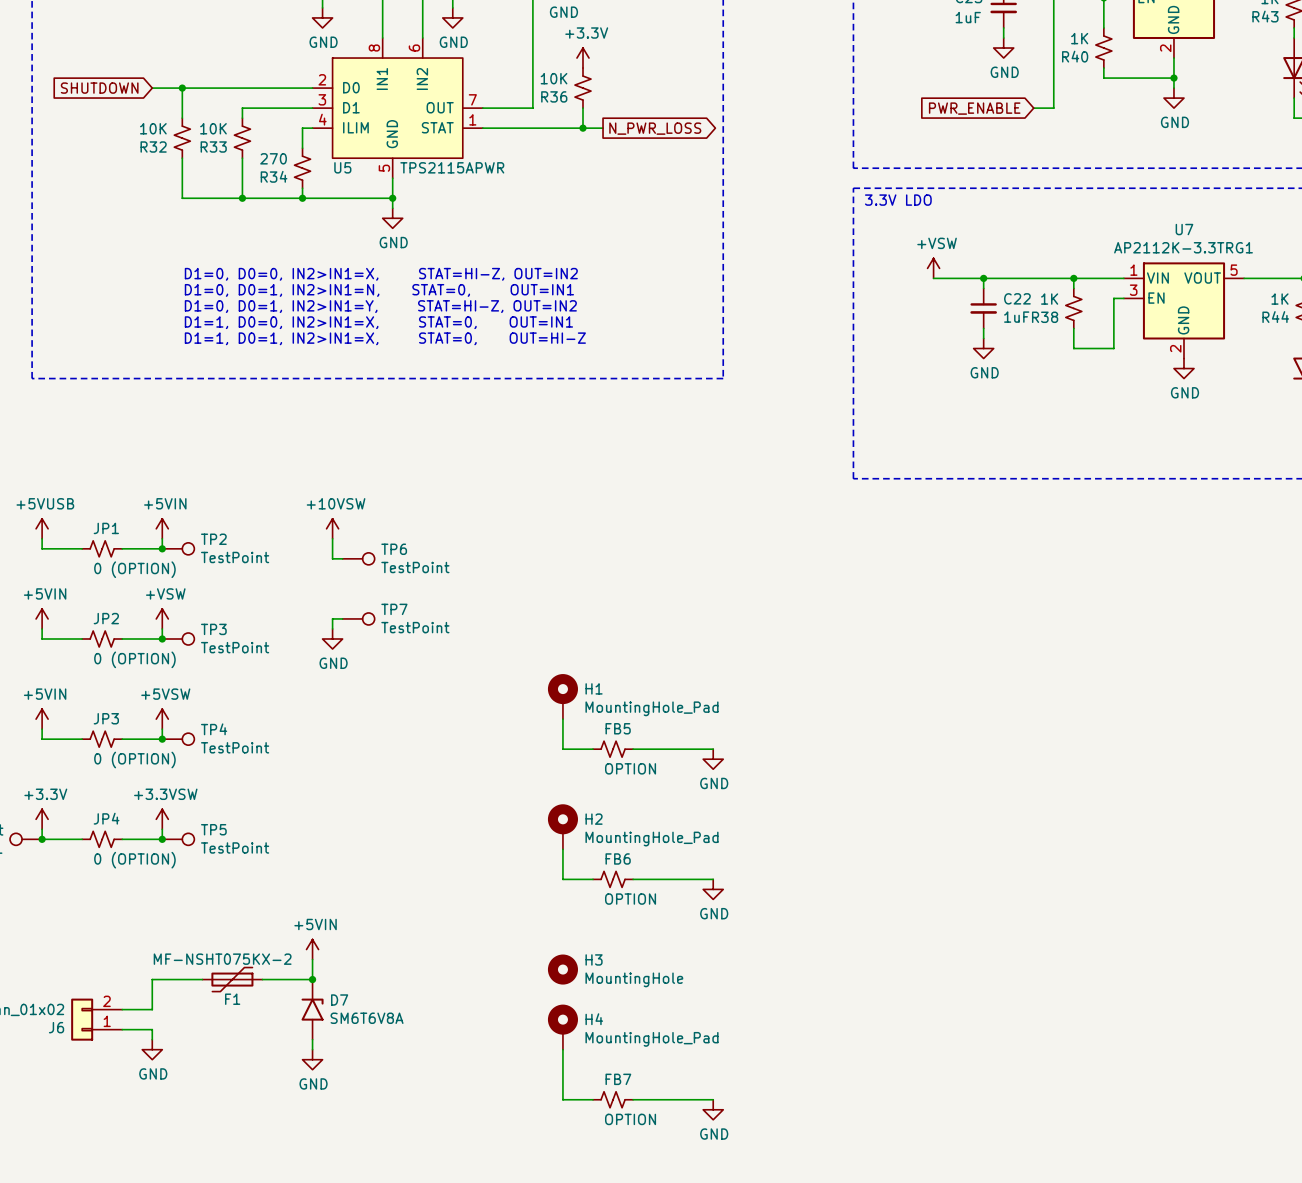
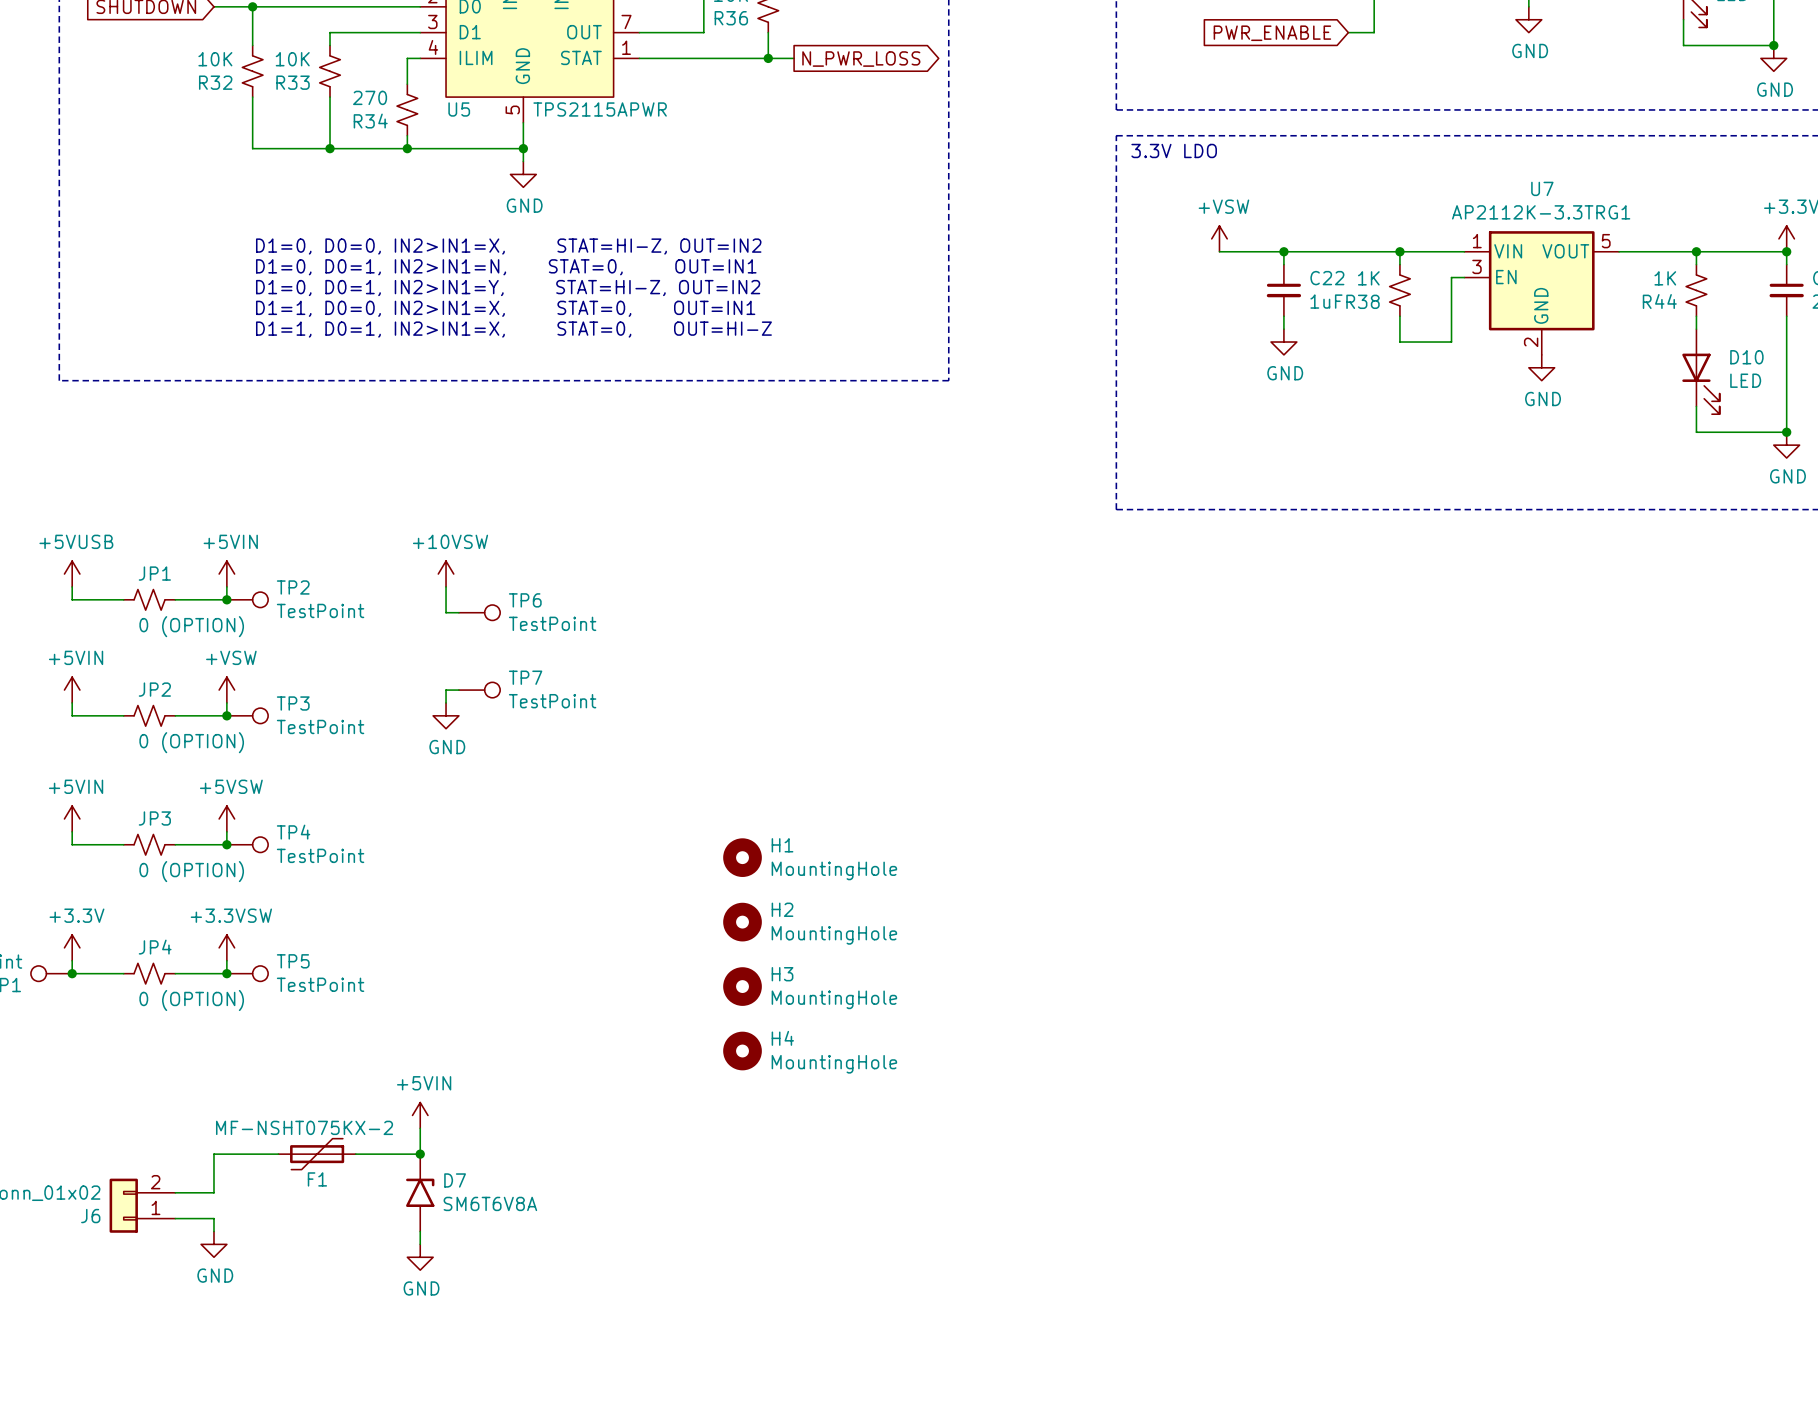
H1 symbol: [547, 674, 578, 720] -> [723, 838, 762, 877]
H1 value: MountingHole_Pad (651, 708) -> MountingHole (834, 870)
wire: (562, 719) (562, 749) (593, 749) -> none
FB5: OPTION (613, 749) -> none
wire: (633, 749) (713, 749) -> none
power symbol: GND (713, 759) -> none
H2 symbol: [547, 804, 578, 850] -> [723, 902, 762, 942]
H2 value: MountingHole_Pad (651, 839) -> MountingHole (834, 935)
wire: (562, 849) (562, 879) (593, 879) -> none
FB6: OPTION (613, 879) -> none
wire: (633, 879) (713, 879) -> none
power symbol: GND (713, 889) -> none
H3 position: (562, 969) -> (742, 986)
H4 symbol: [547, 1004, 578, 1050] -> [723, 1031, 762, 1071]
H4 value: MountingHole_Pad (651, 1039) -> MountingHole (834, 1064)
wire: (562, 1049) (562, 1099) (593, 1099) -> none
FB7: OPTION (613, 1099) -> none
wire: (633, 1099) (713, 1099) -> none
power symbol: GND (713, 1109) -> none

